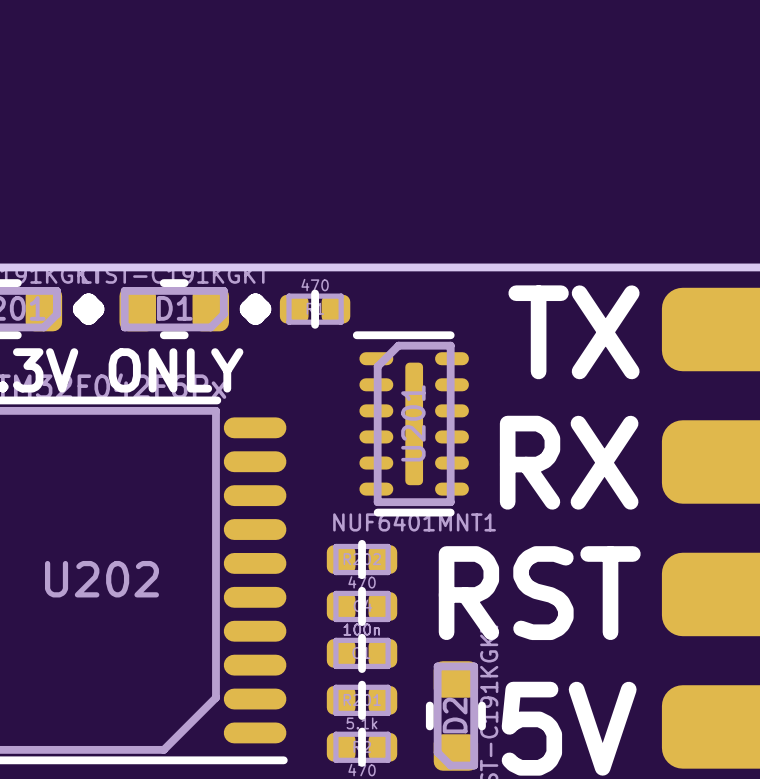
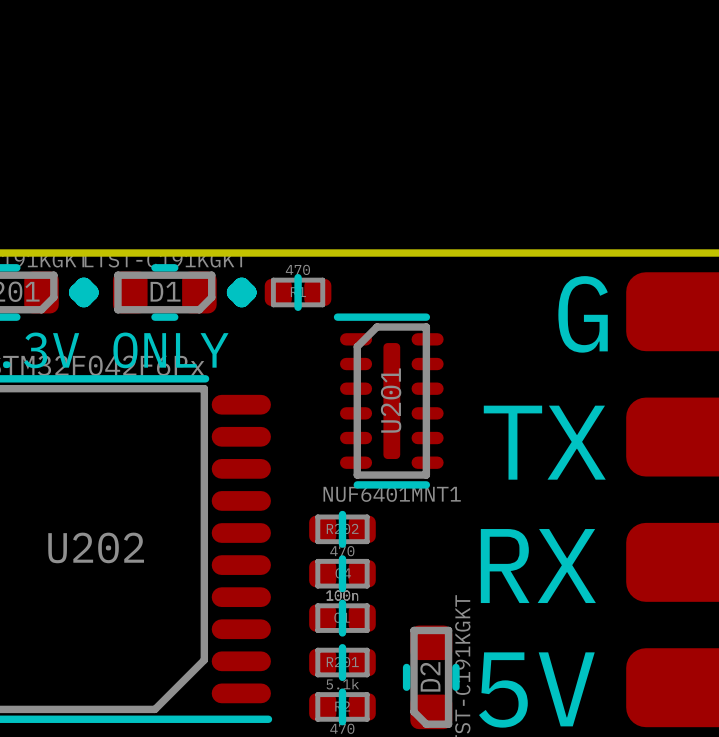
text: TX (574, 332) -> G (583, 314)
text: RX (569, 462) -> TX (544, 442)
text: RST (539, 593) -> RX (538, 566)

